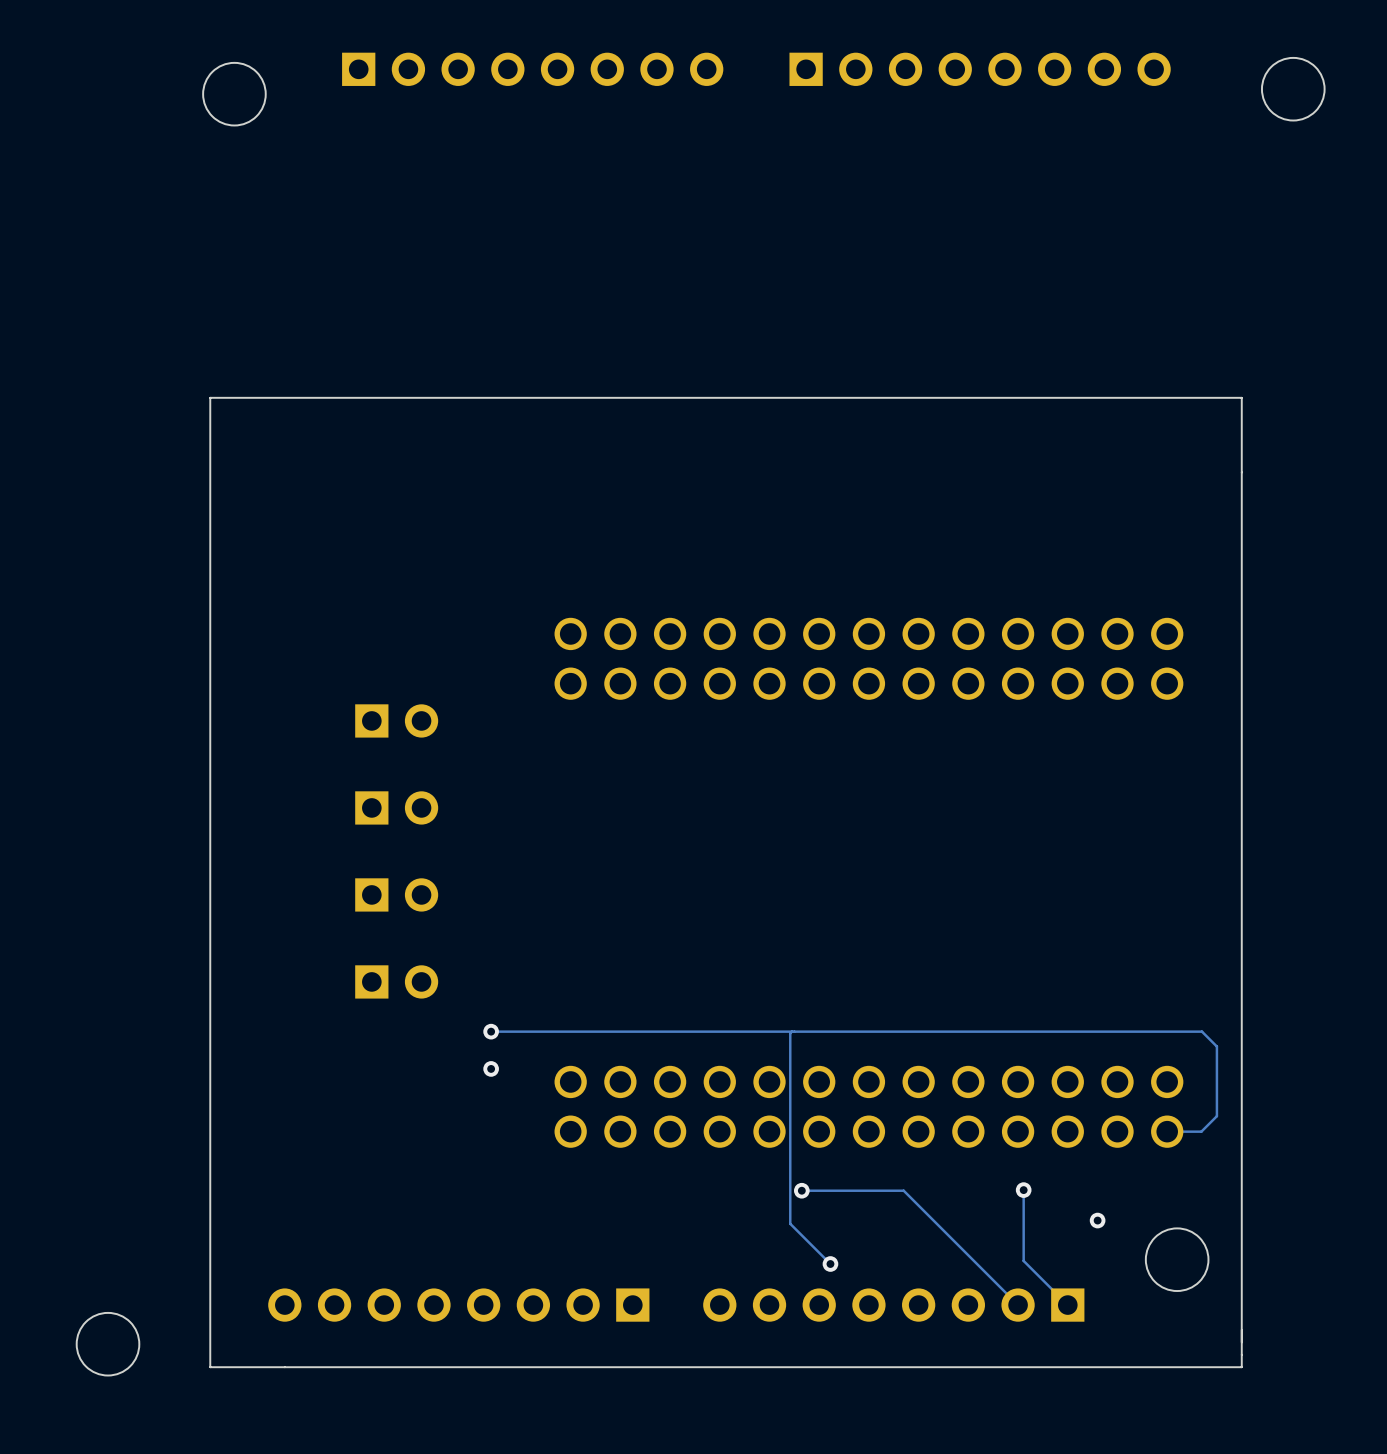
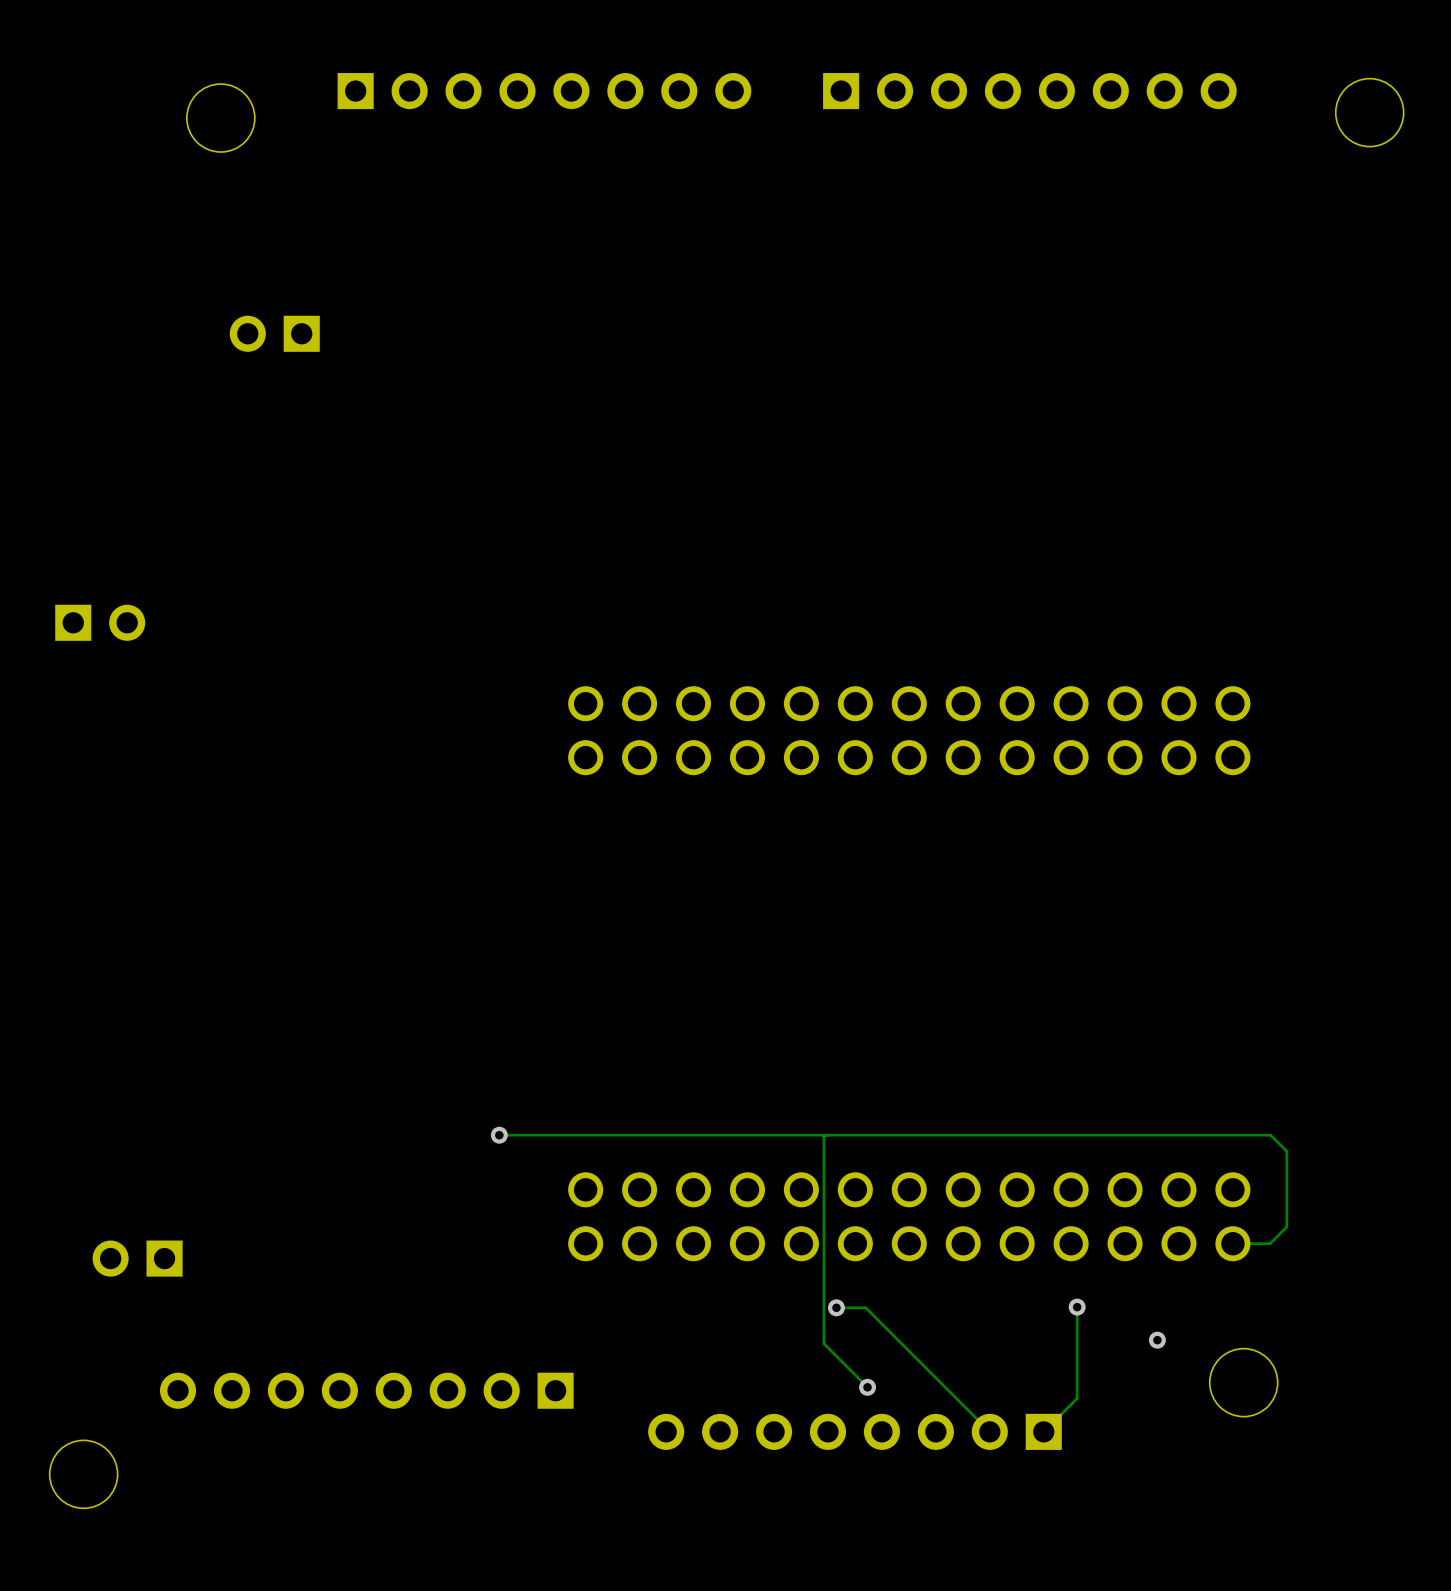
part: none -> (274, 333)
board edge: (1241, 397) (210, 397) (210, 1367) (1241, 1367) (1241, 397) -> none
part: none -> (100, 622)
part: (396, 720) -> none
part: (396, 807) -> none
part: (396, 894) -> none
part: (396, 981) -> none
via: (491, 1068) -> none
part: none -> (137, 1258)
track: (828, 1190) (903, 1190) (1018, 1305) -> (865, 1307) (989, 1431)
track: (1023, 1260) (1067, 1305) -> (1077, 1384) (1077, 1398) (1043, 1431)
part position: (458, 1305) -> (366, 1390)
part position: (893, 1305) -> (854, 1431)

